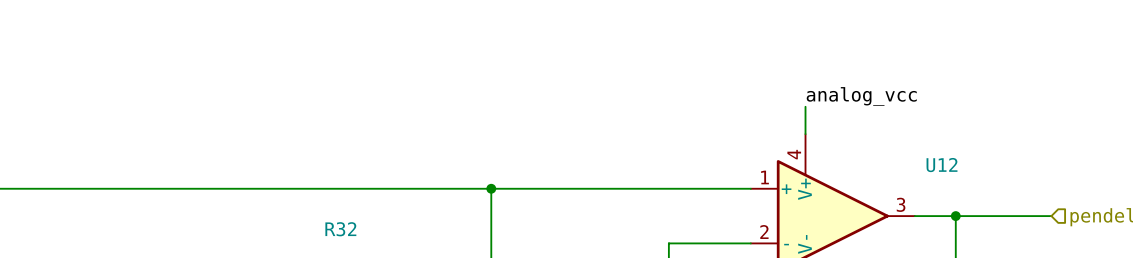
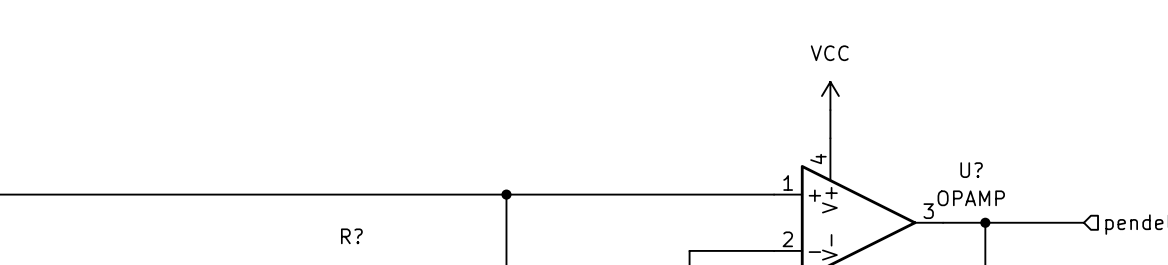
power symbol: none -> VCC (830, 96)
label: analog_vcc (861, 96) -> none
U12 name: U12 (942, 165) -> U? (971, 170)
U12 value: none -> OPAMP (971, 198)
R32 name: R32 (340, 229) -> R? (351, 236)

